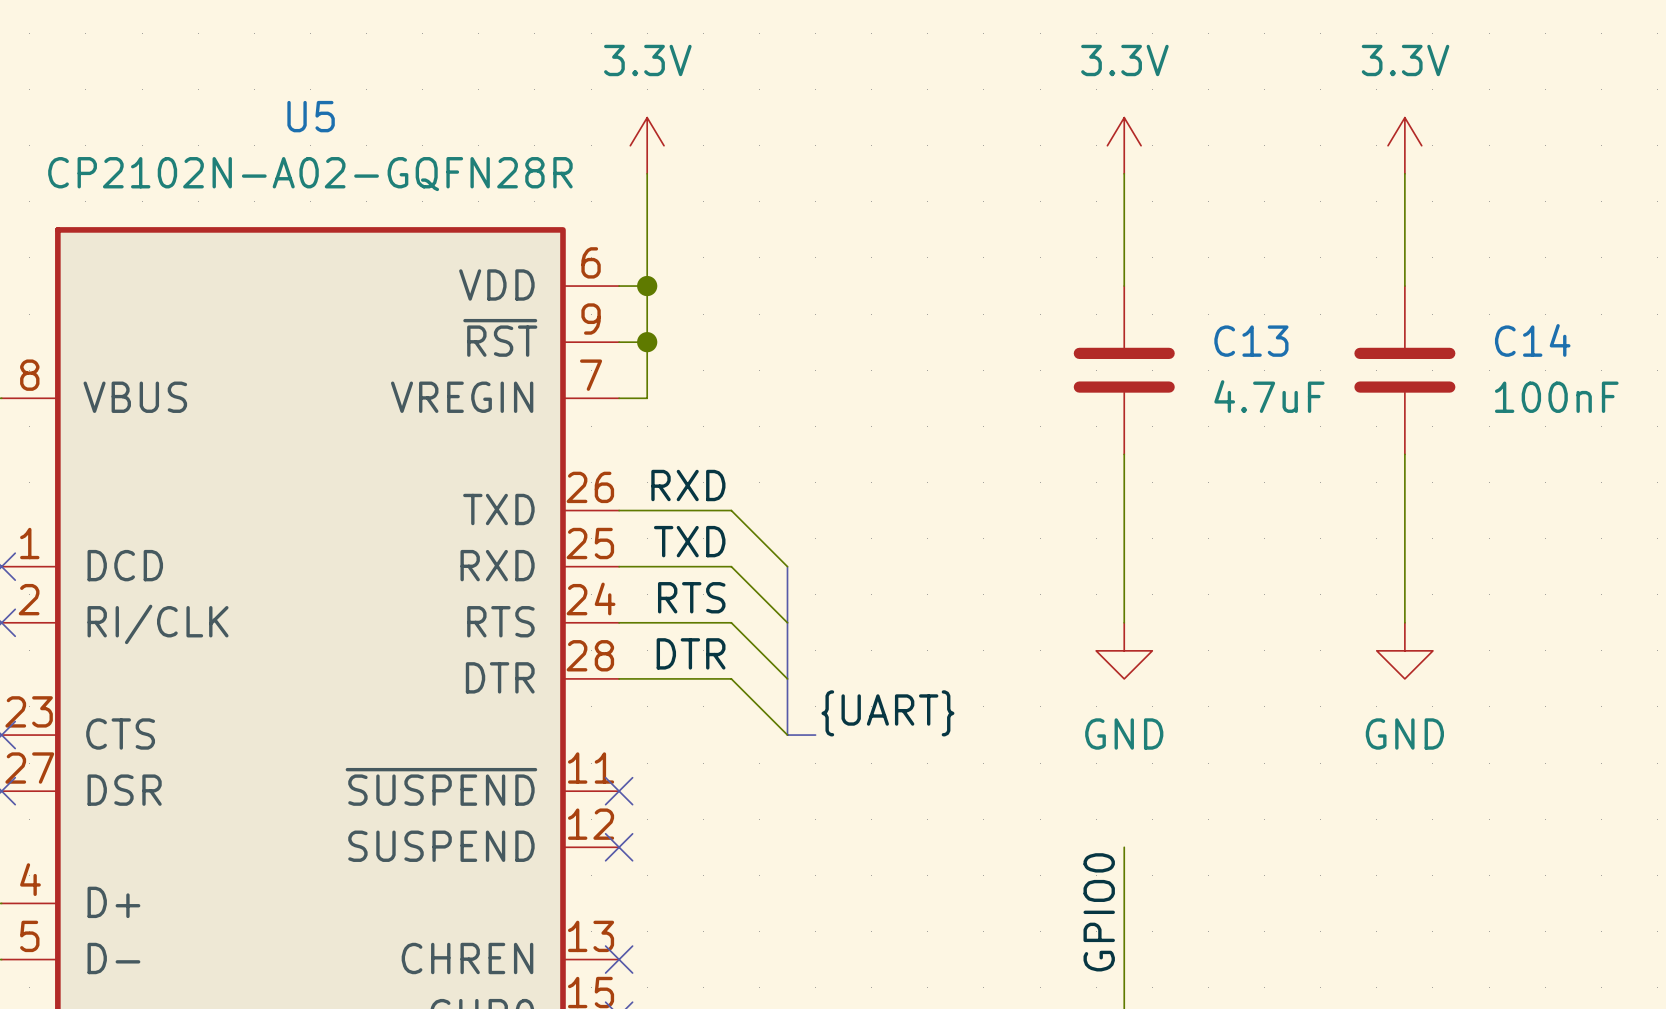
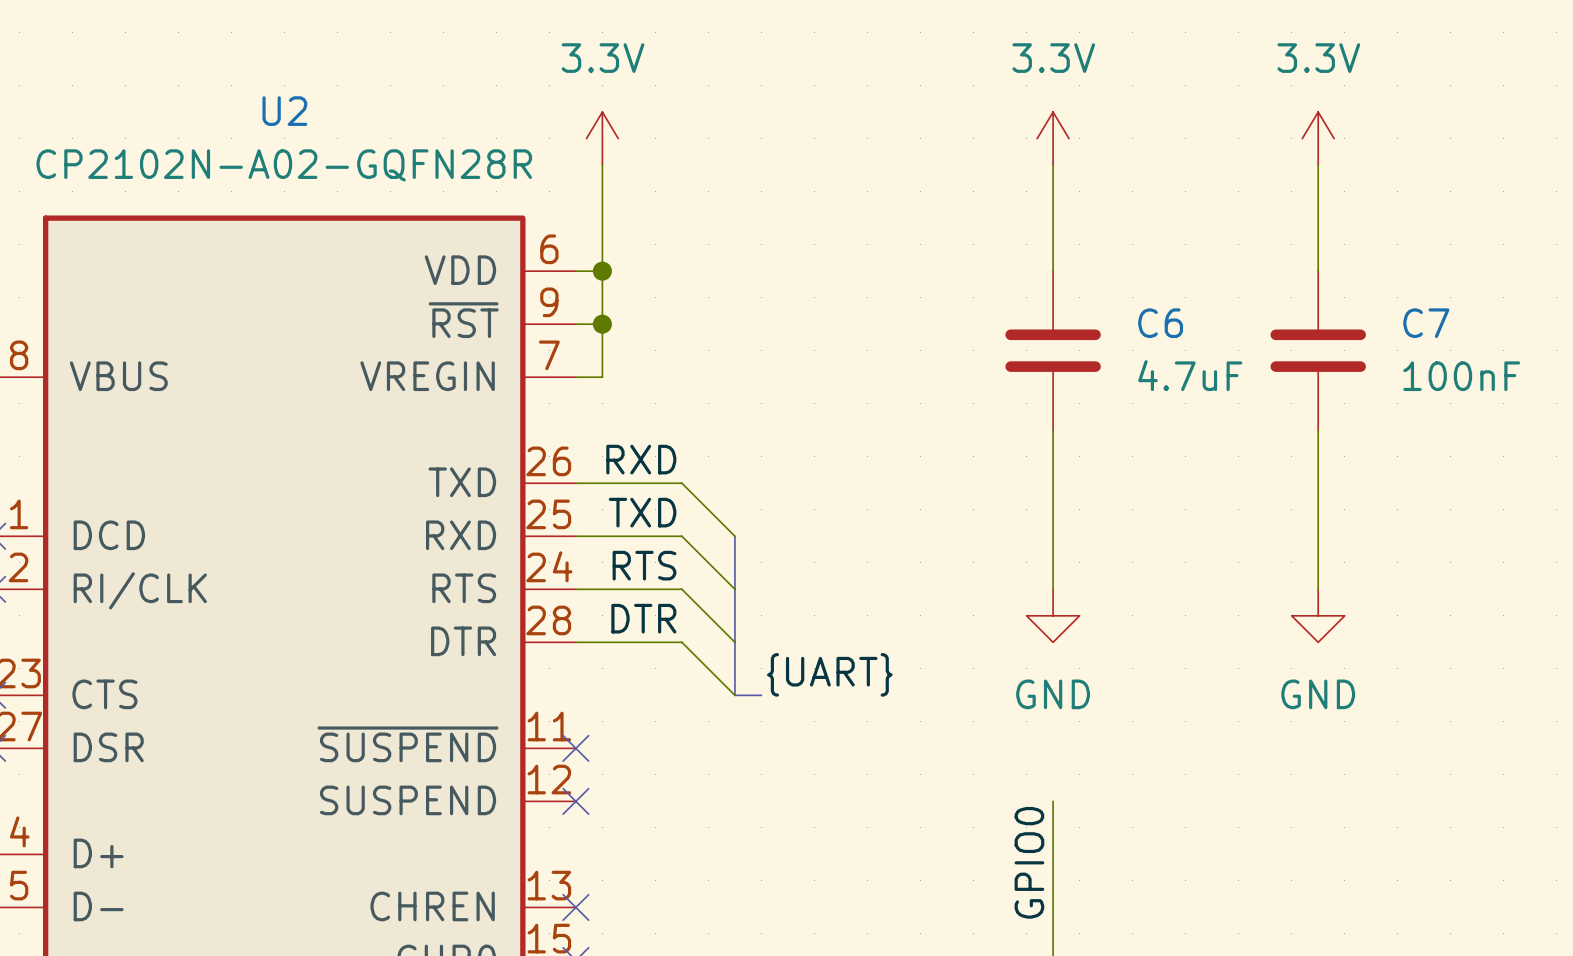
U5 name: U5 (311, 116) -> U2 (284, 111)
C14 name: C14 (1532, 340) -> C7 (1426, 323)
C13 name: C13 (1251, 341) -> C6 (1160, 323)

